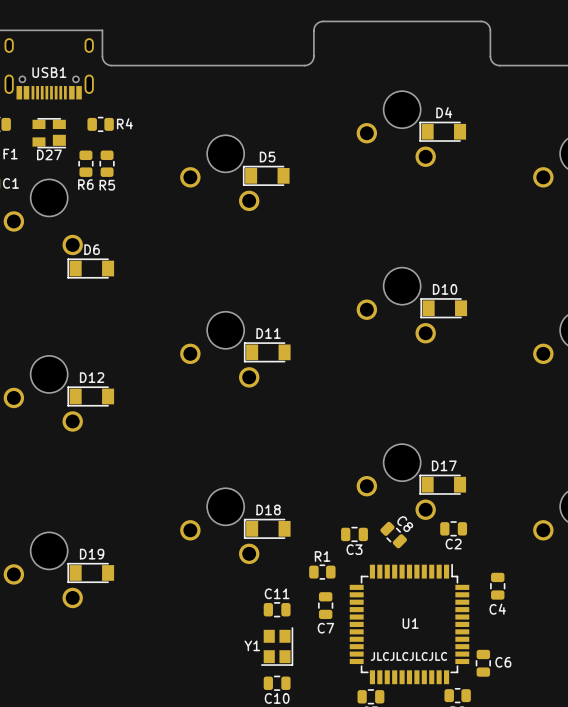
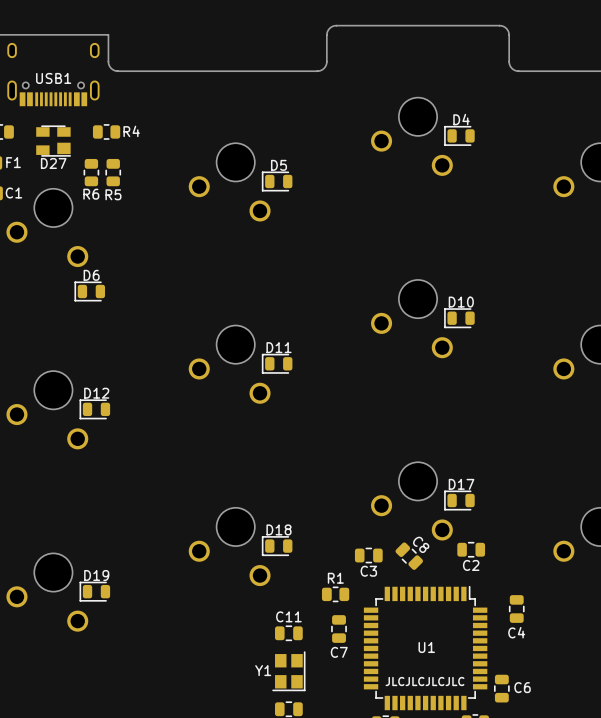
D4 footprint: [419, 121, 467, 142] -> [444, 126, 475, 146]
D5 footprint: [243, 166, 290, 186] -> [262, 171, 293, 192]
D6 footprint: [67, 258, 115, 279] -> [74, 281, 106, 302]
D10 footprint: [420, 298, 468, 319] -> [444, 308, 475, 328]
D11 footprint: [244, 342, 291, 363] -> [262, 354, 293, 374]
D12 footprint: [67, 386, 115, 407] -> [79, 399, 111, 420]
D17 footprint: [419, 474, 467, 495] -> [444, 490, 475, 511]
D18 footprint: [244, 519, 291, 539] -> [262, 536, 293, 556]
D19 footprint: [67, 563, 115, 583] -> [79, 581, 111, 602]

